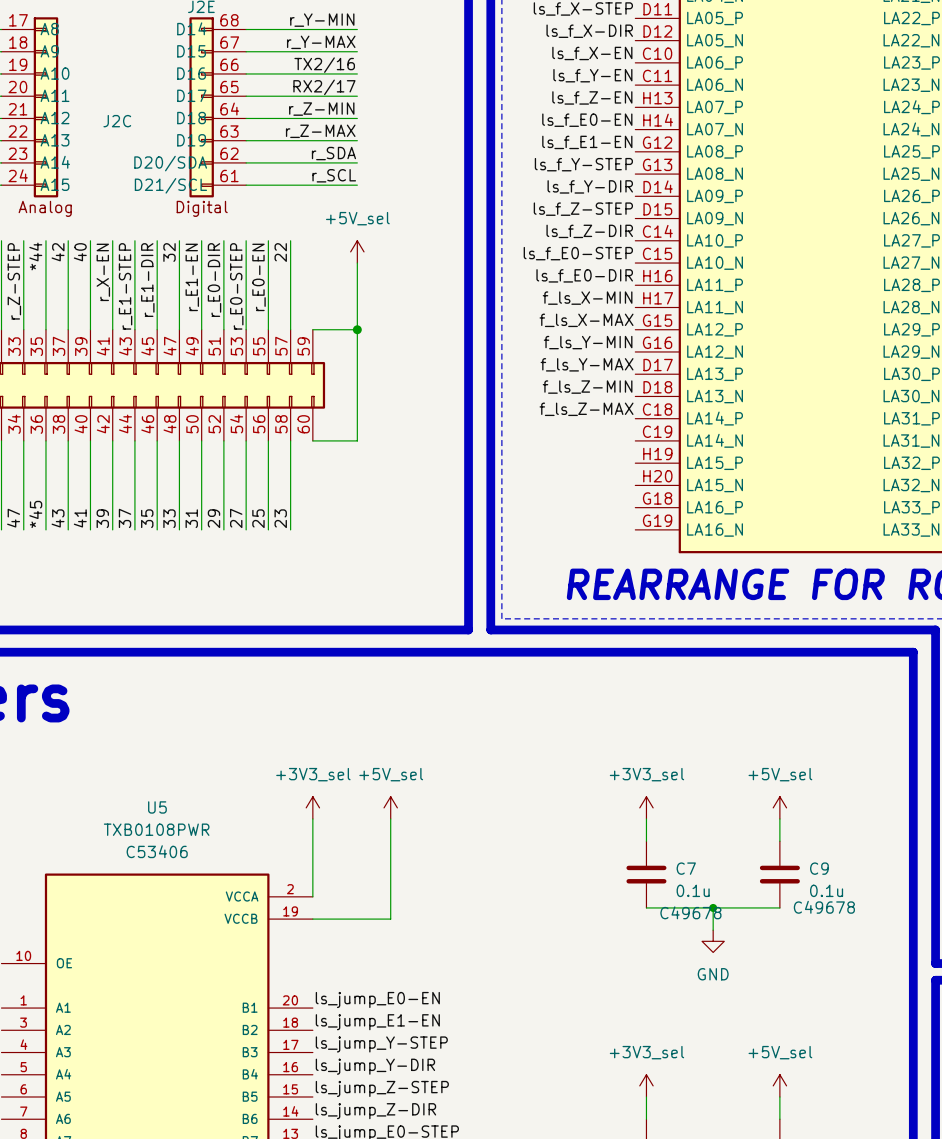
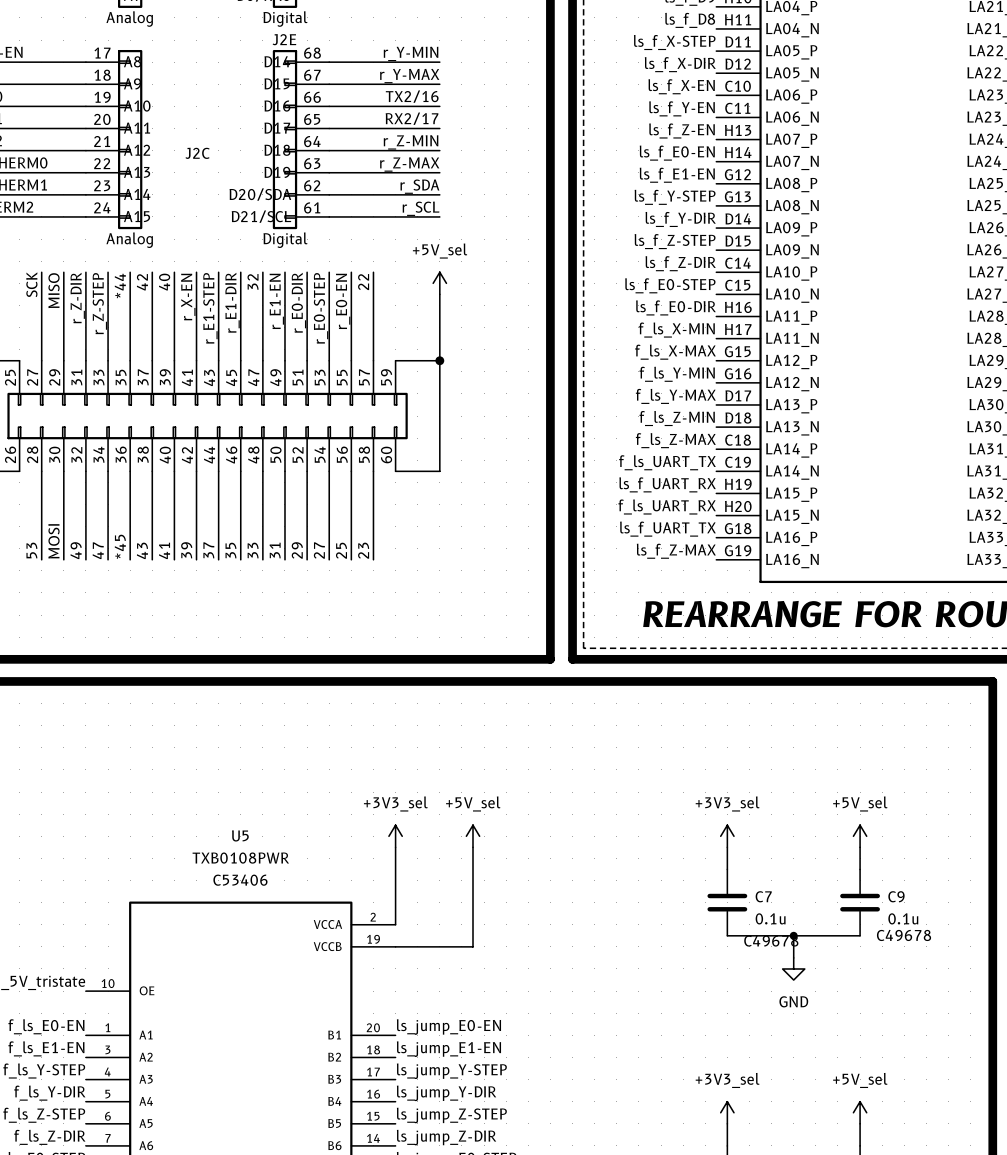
label: none -> f_ls_UART_TX (667, 462)
label: none -> ls_f_UART_RX (667, 484)
label: none -> f_ls_UART_RX (667, 506)
label: none -> ls_f_UART_TX (667, 529)
label: none -> ls_f_Z-MAX (676, 551)

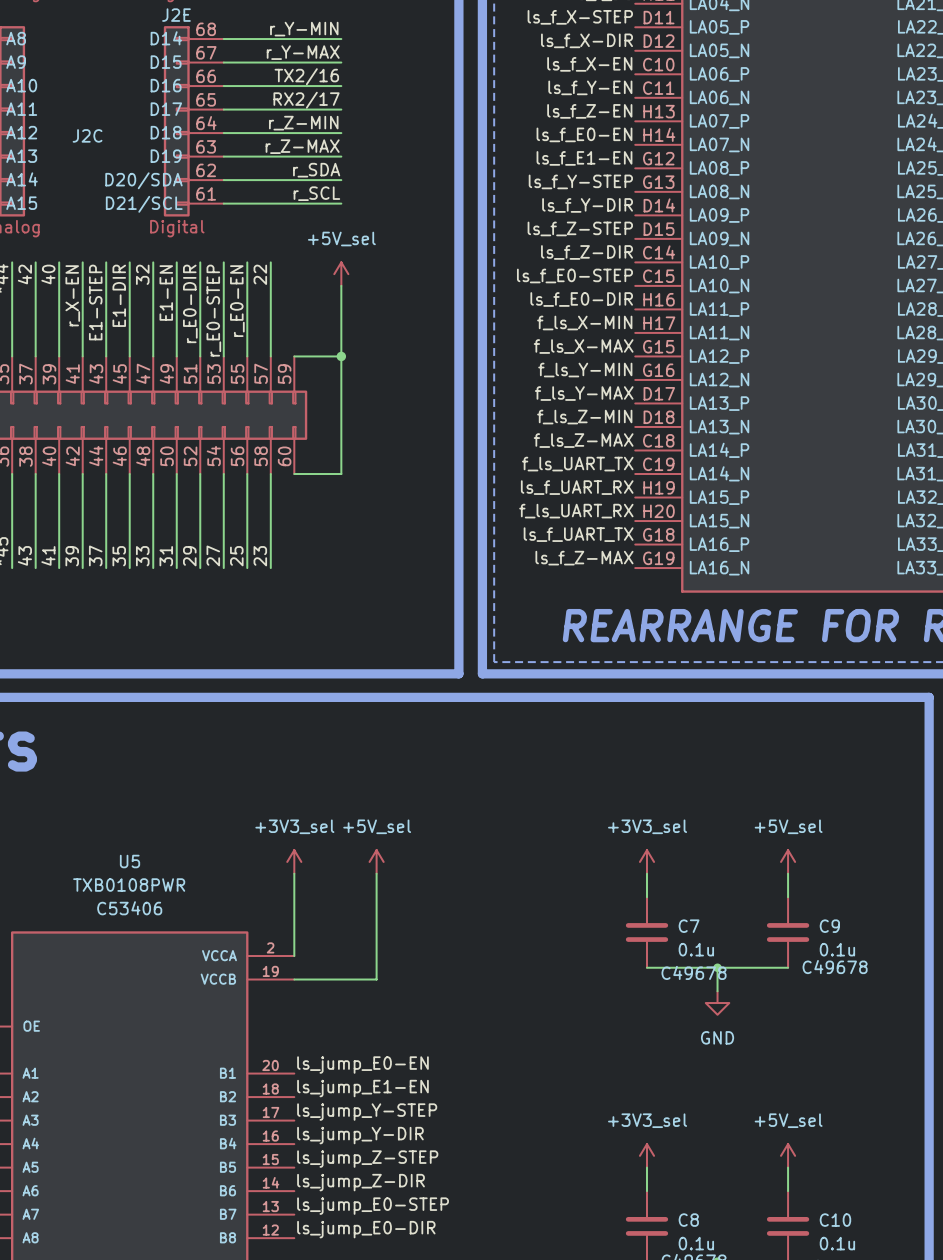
label: r_E1-EN (276, 301) -> E1-EN (166, 292)
label: r_E1-DIR (232, 302) -> E1-DIR (119, 295)
label: r_E1-STEP (210, 308) -> E1-STEP (95, 302)

